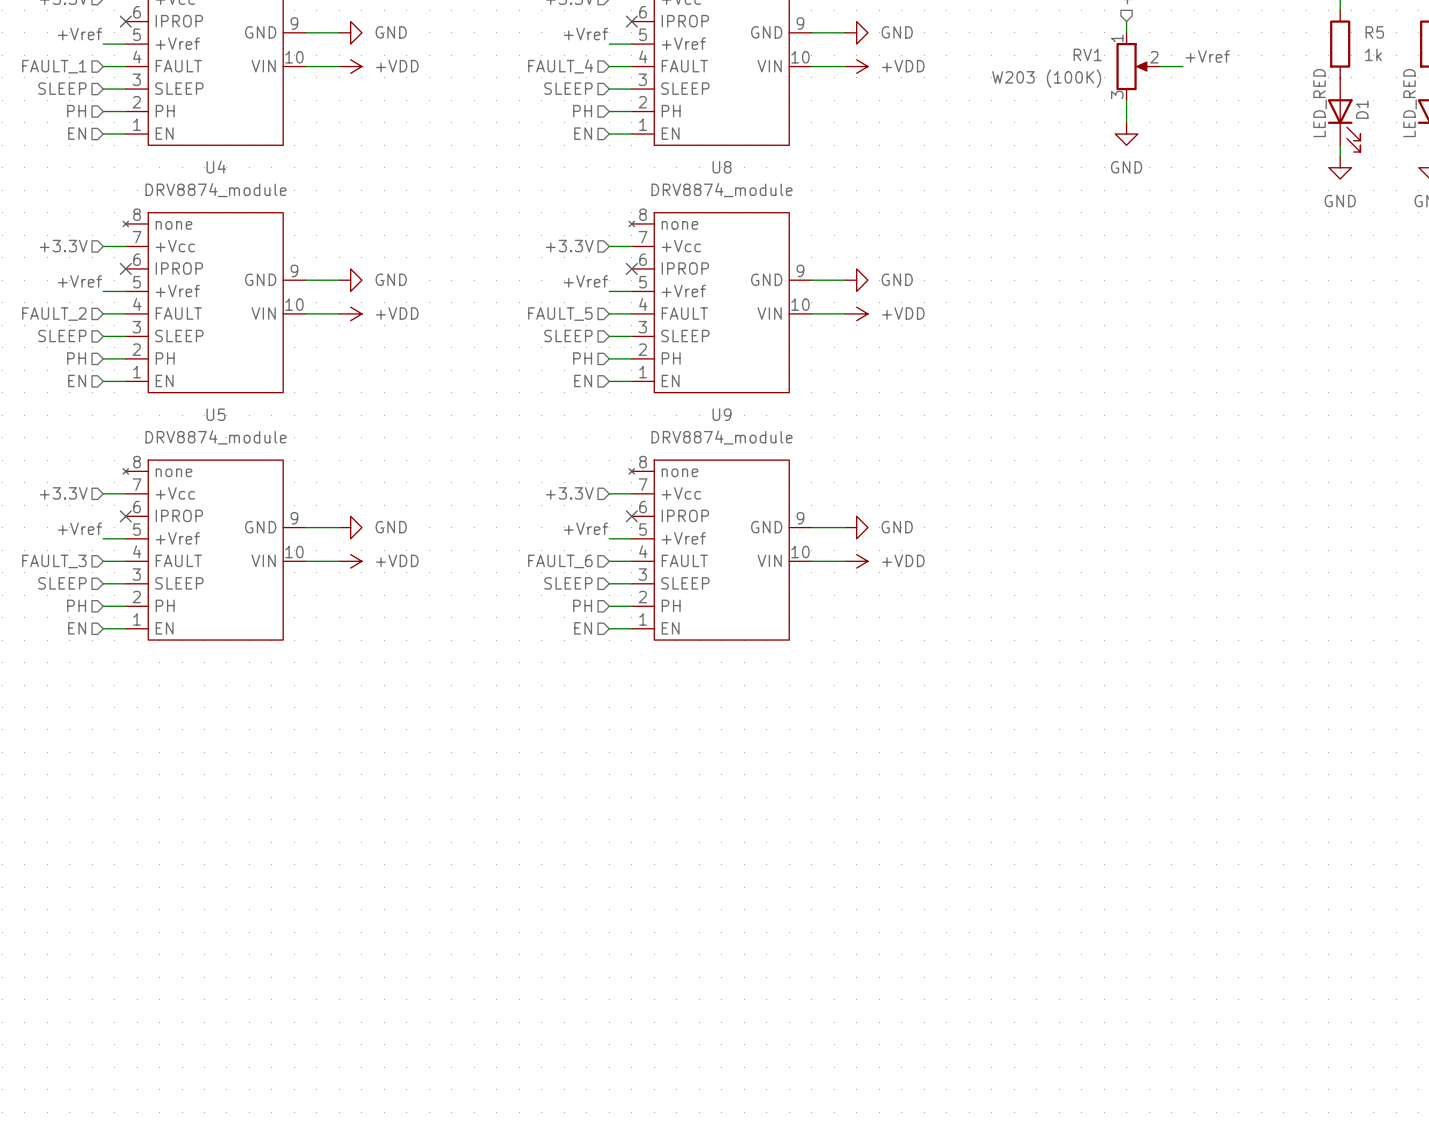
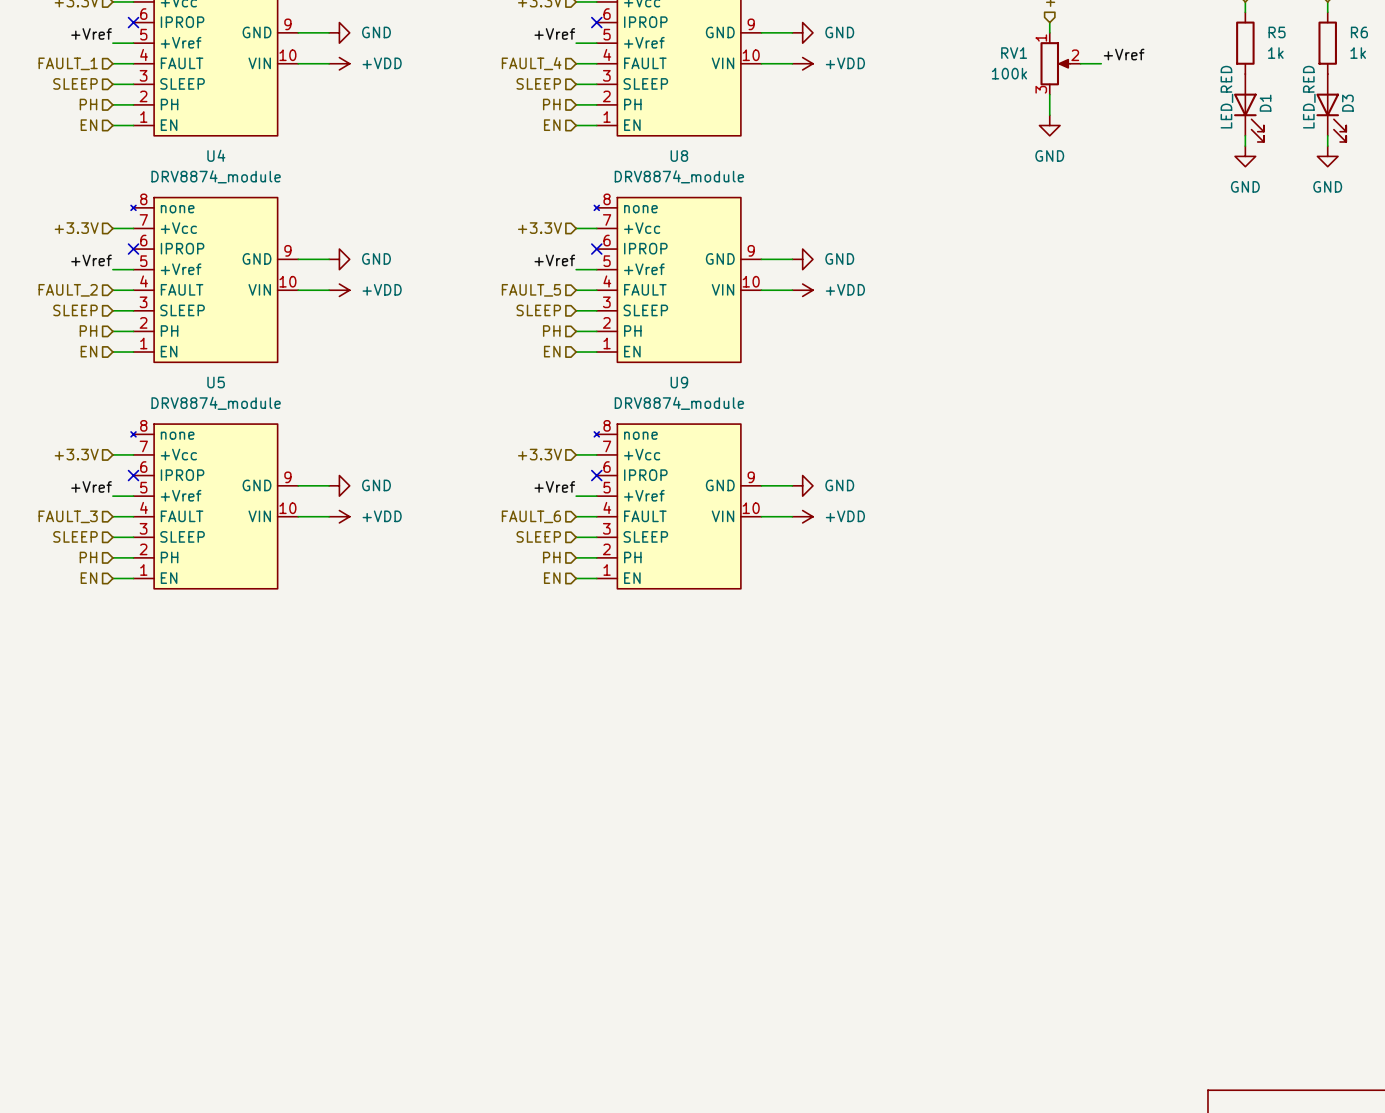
RV1 value: W203 (100K) (1046, 78) -> 100k (1009, 73)

